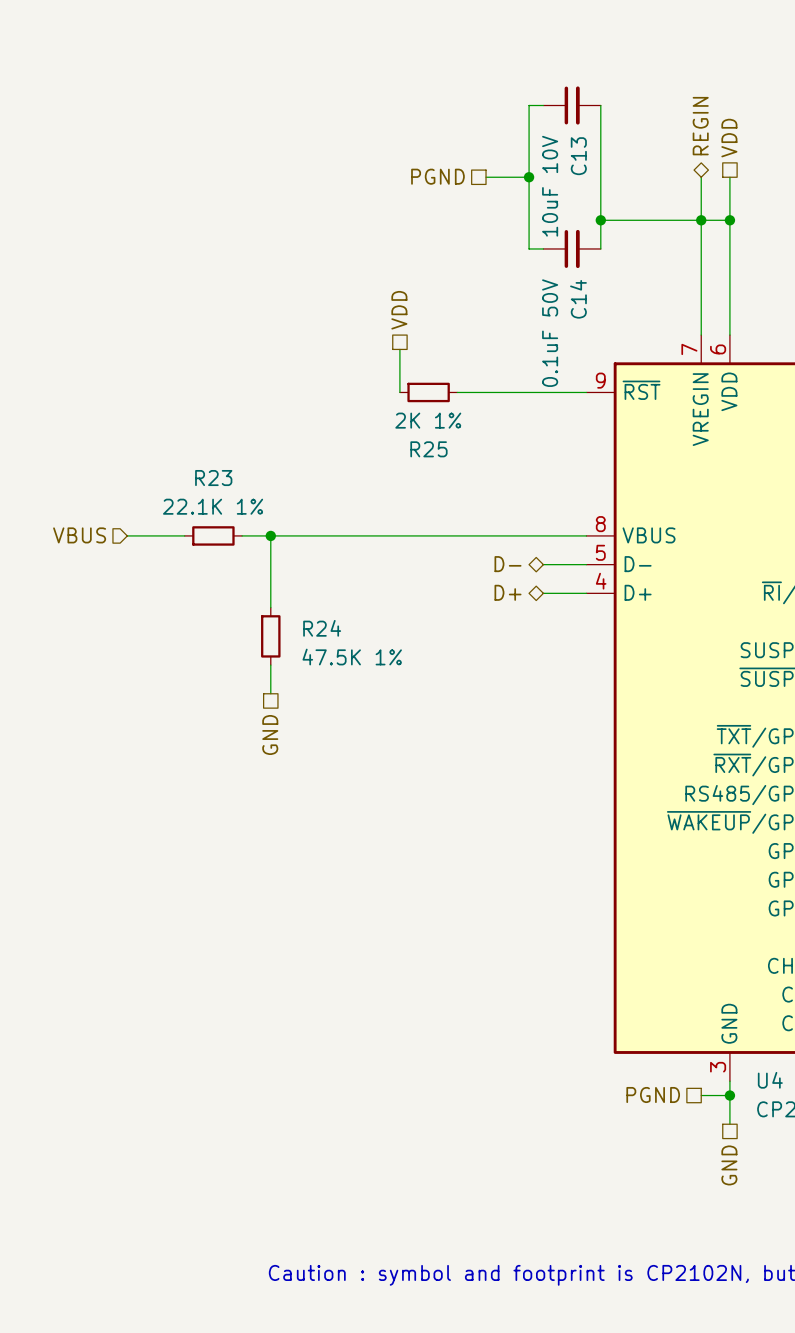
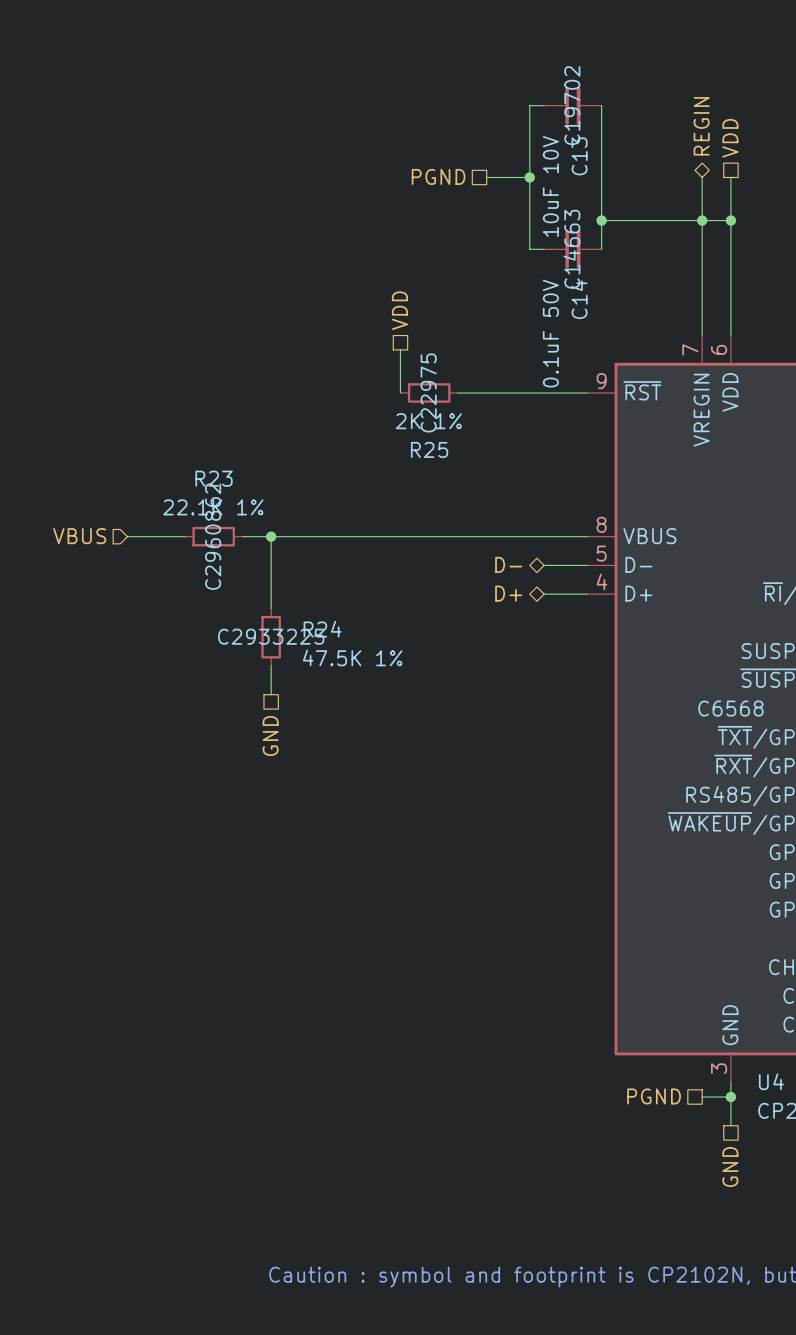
C13 text: none -> C19702 (572, 105)
C14 text: none -> C14663 (572, 249)
R25 text: none -> C22975 (428, 393)
R23 text: none -> C2960862 (213, 536)
R24 text: none -> C2933225 (271, 636)
U4 text: none -> C6568 (730, 708)

